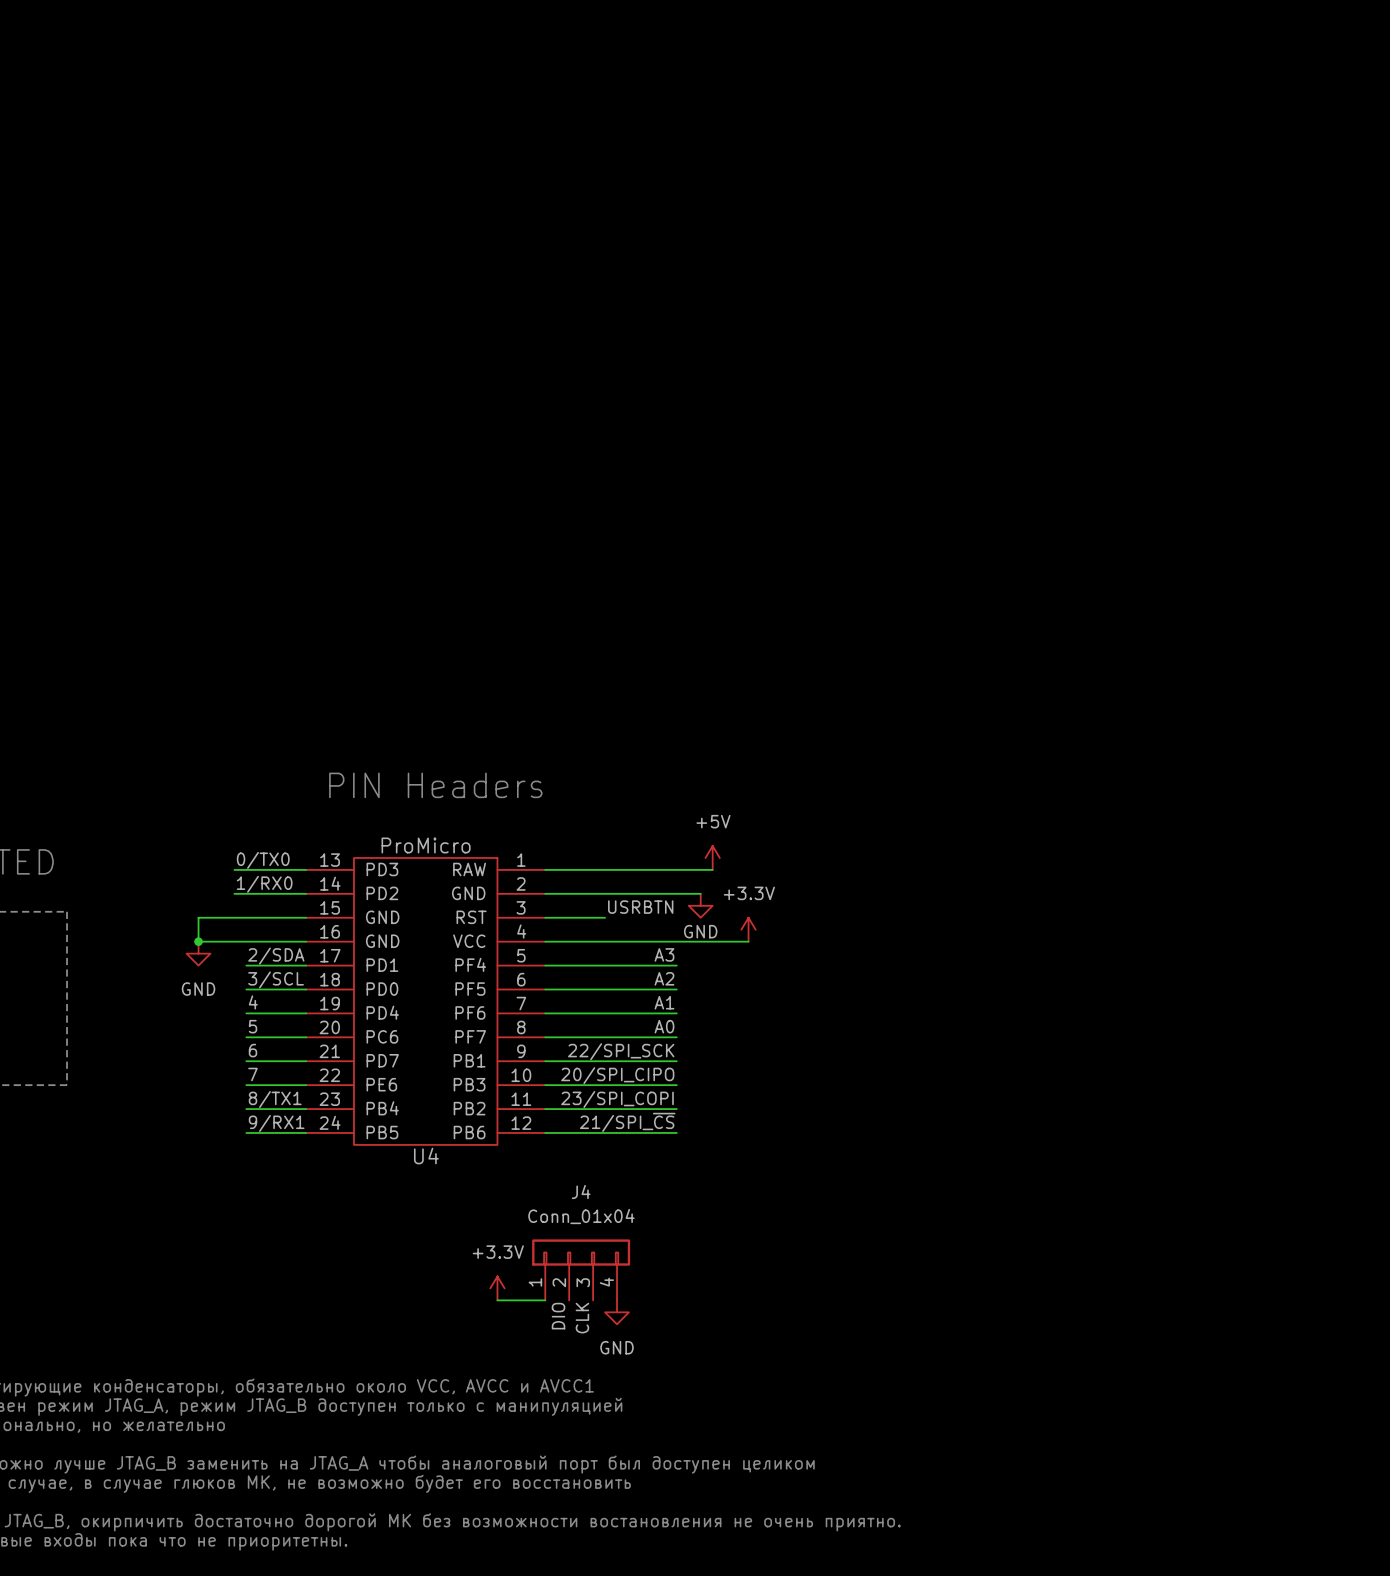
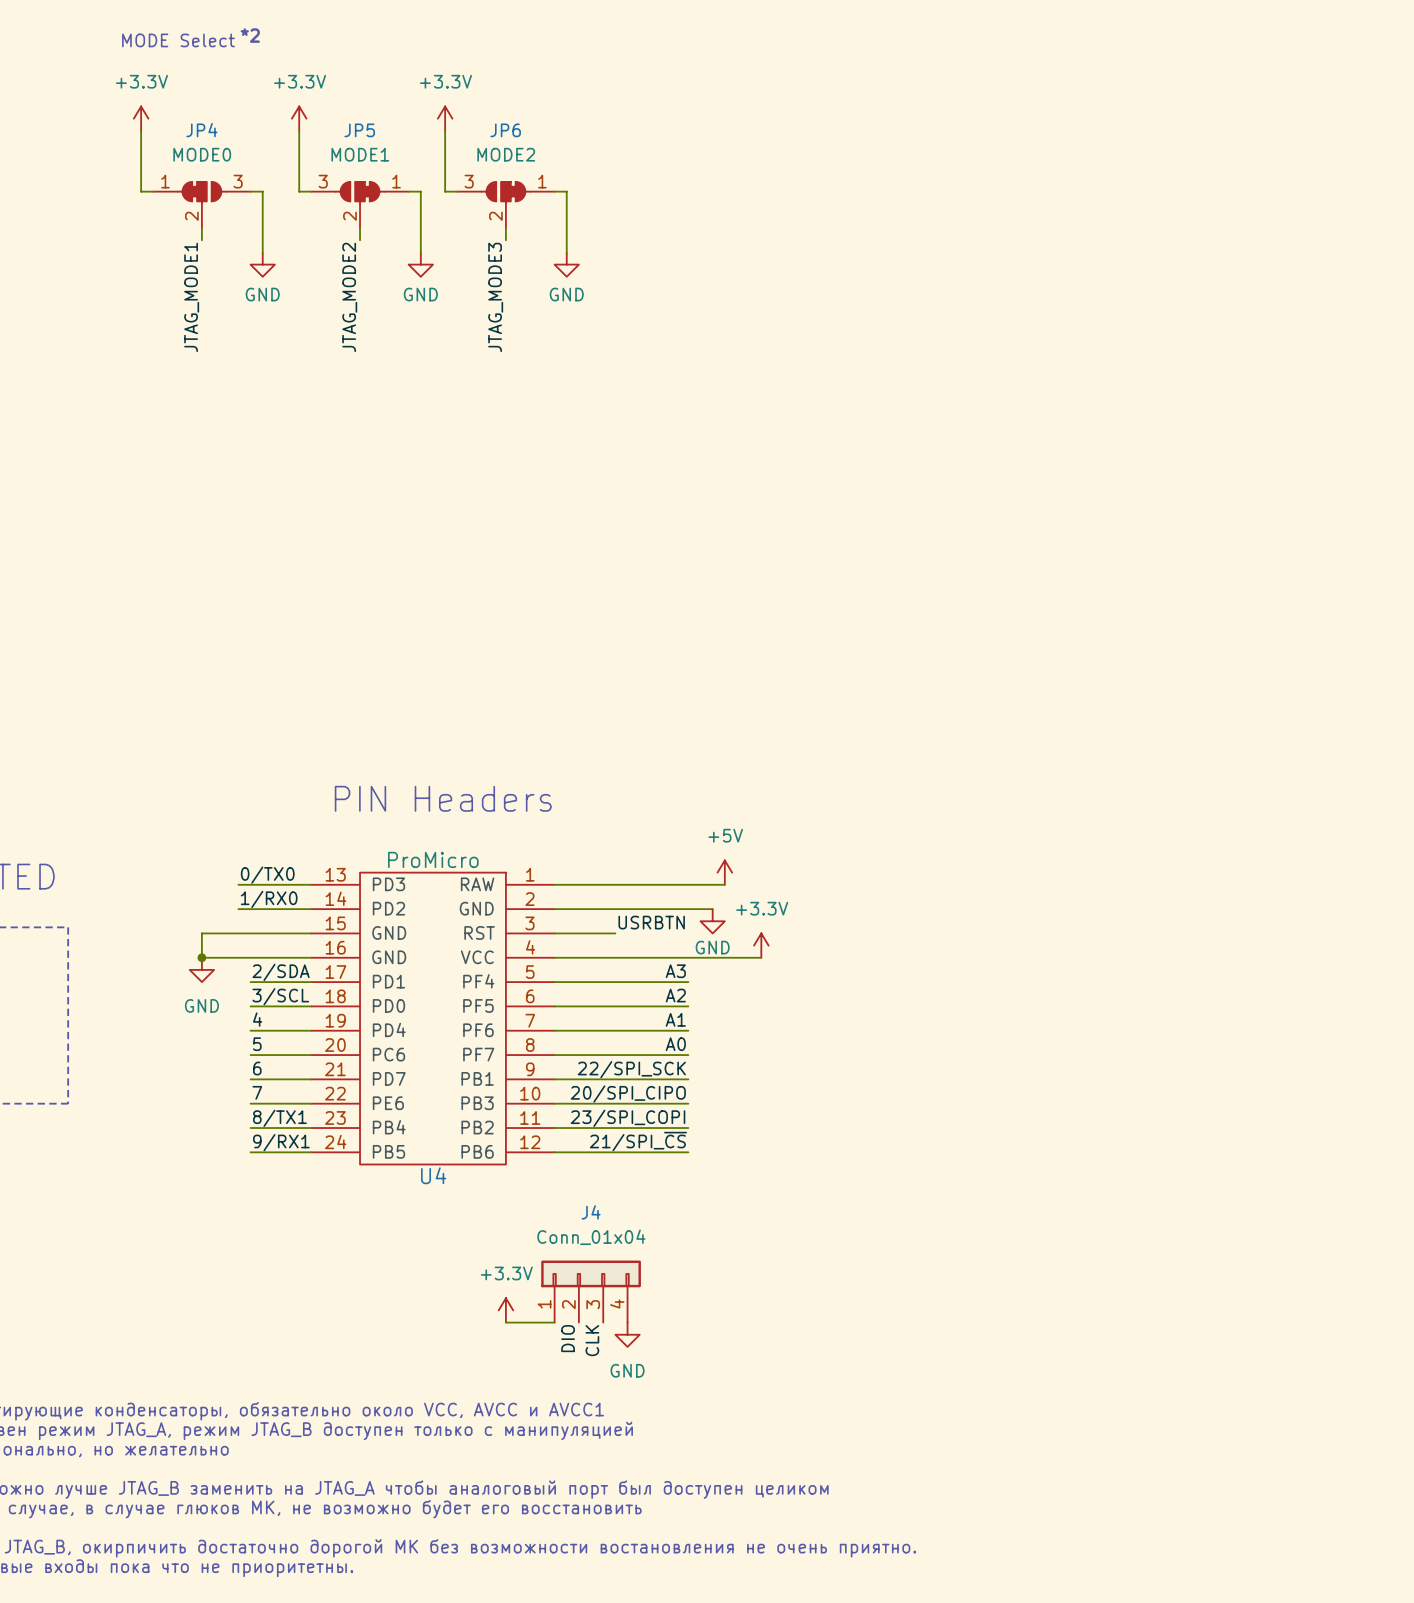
text: none -> *2 (250, 35)
text: none -> MODE Select (178, 40)
power symbol: none -> +3.3V (141, 118)
power symbol: none -> +3.3V (299, 118)
power symbol: none -> +3.3V (445, 118)
wire: none -> (141, 130) (141, 191) (153, 191)
wire: none -> (299, 130) (299, 191) (311, 191)
wire: none -> (445, 130) (445, 191) (457, 191)
wire: none -> (250, 191) (262, 191) (262, 252)
wire: none -> (408, 191) (420, 191) (420, 252)
wire: none -> (554, 191) (566, 191) (566, 252)
JP4: none -> MODE0 (201, 205)
JP5: none -> MODE1 (360, 205)
JP6: none -> MODE2 (505, 205)
wire: none -> (201, 228) (201, 240)
wire: none -> (360, 228) (360, 240)
wire: none -> (505, 228) (505, 240)
power symbol: none -> GND (262, 264)
power symbol: none -> GND (420, 264)
power symbol: none -> GND (566, 264)
label: none -> JTAG_MODE1 (191, 297)
label: none -> JTAG_MODE2 (349, 297)
label: none -> JTAG_MODE3 (495, 297)

